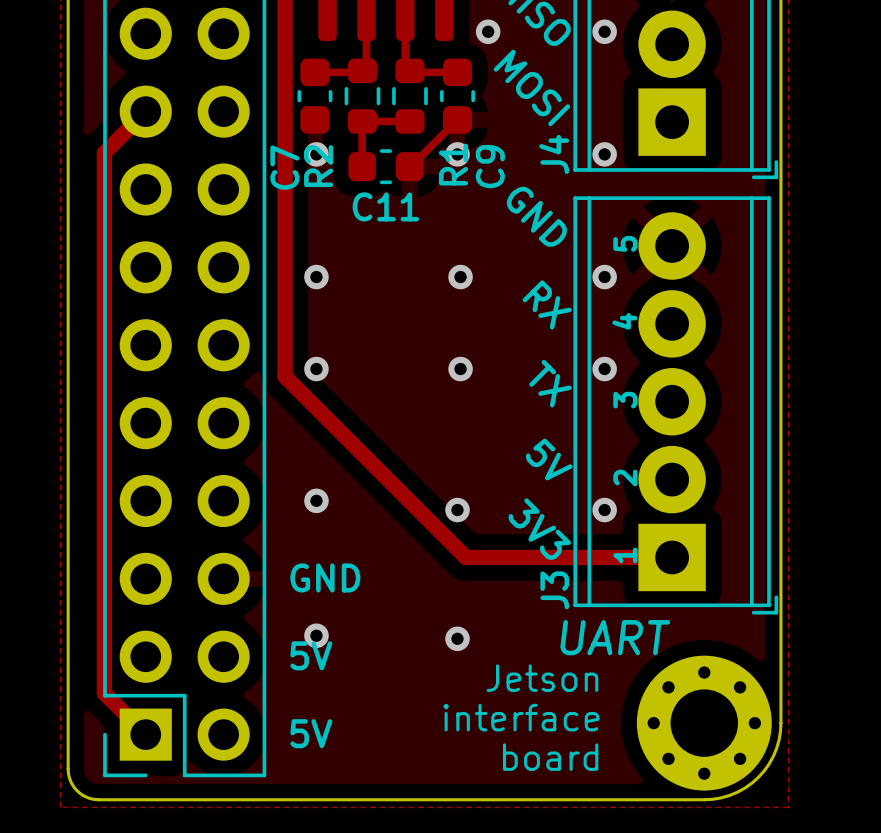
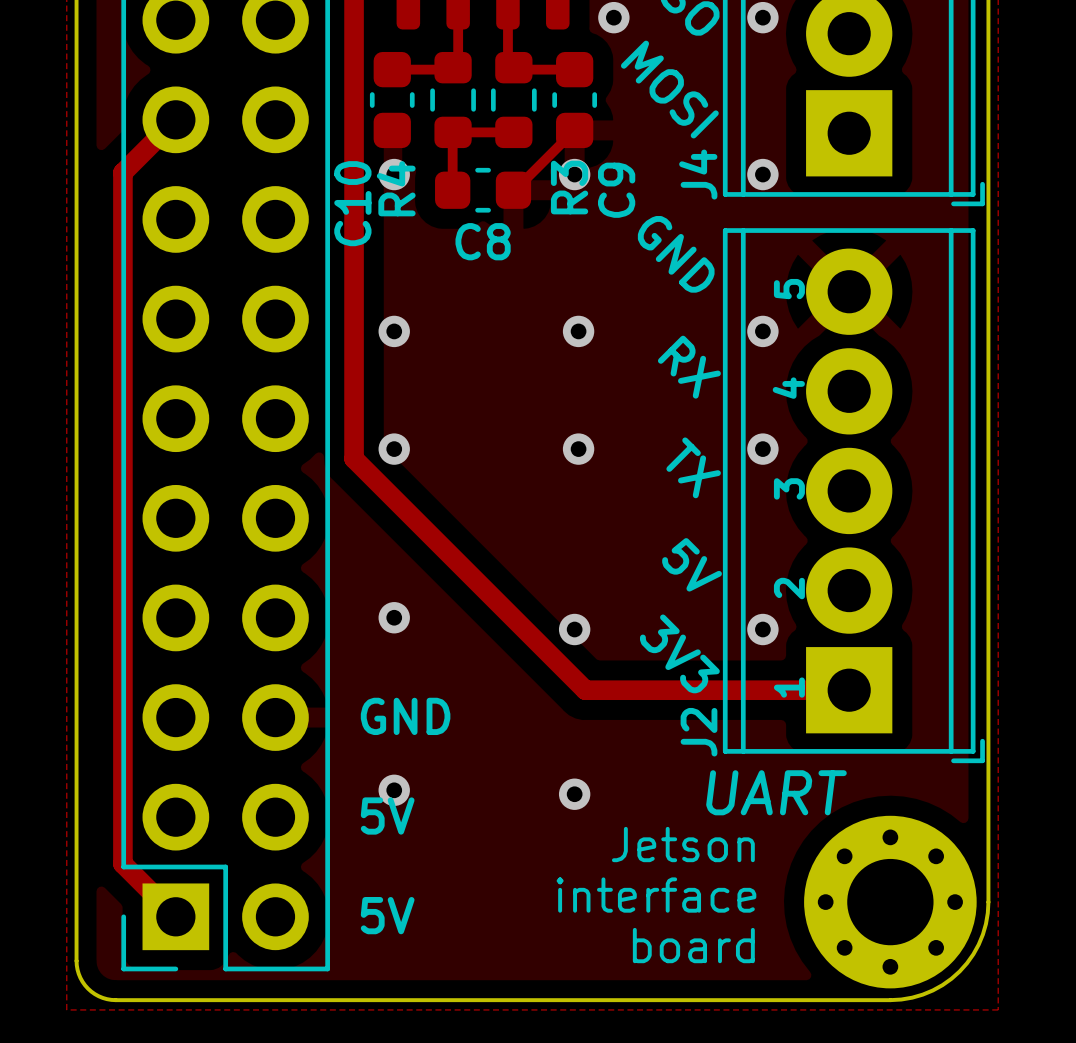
R1 name: R1 (453, 164) -> R3 (569, 187)
R2 name: R2 (318, 166) -> R4 (396, 188)
C7 name: C7 (284, 167) -> C10 (352, 203)
C11 name: C11 (385, 206) -> C8 (483, 241)
J3 name: J3 (554, 590) -> J2 (699, 732)

